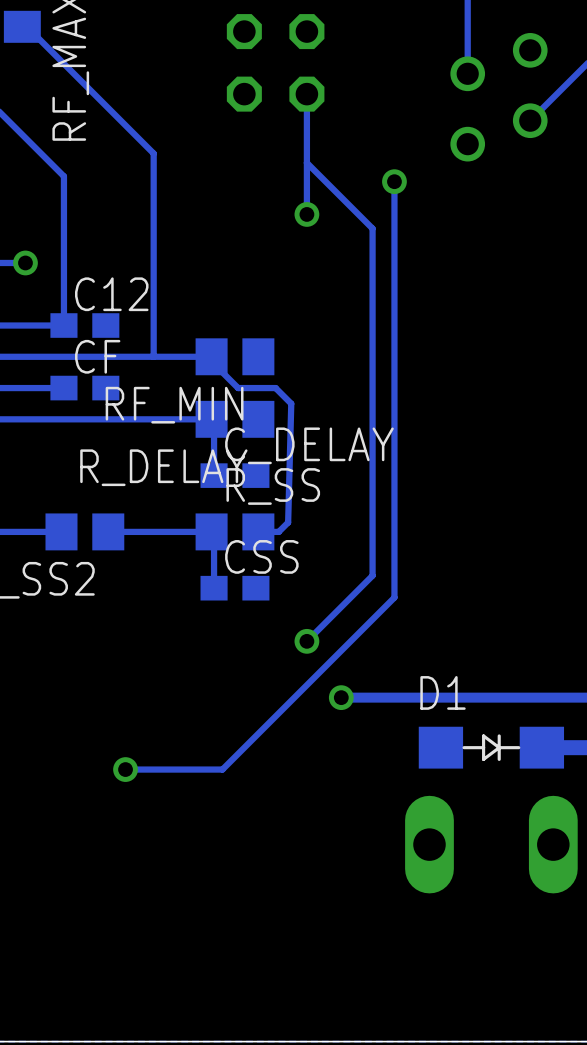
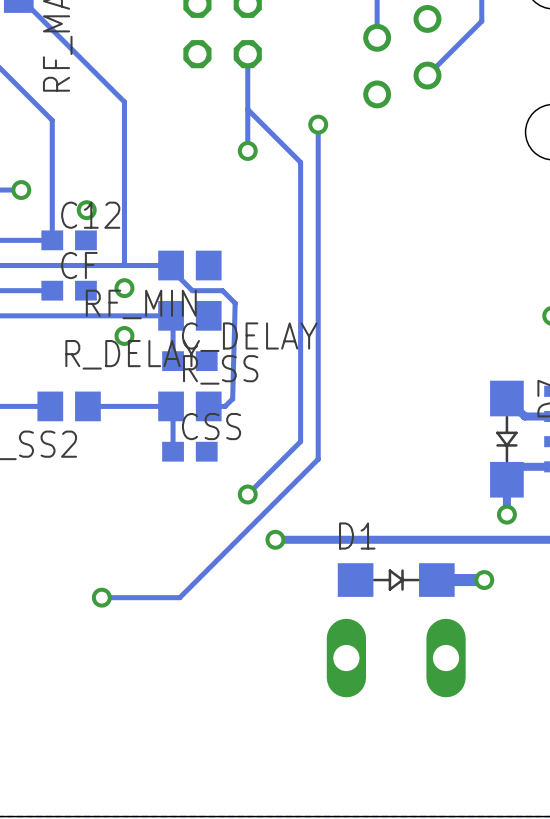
via: none -> (86, 210)
via: none -> (124, 288)
via: none -> (124, 335)

